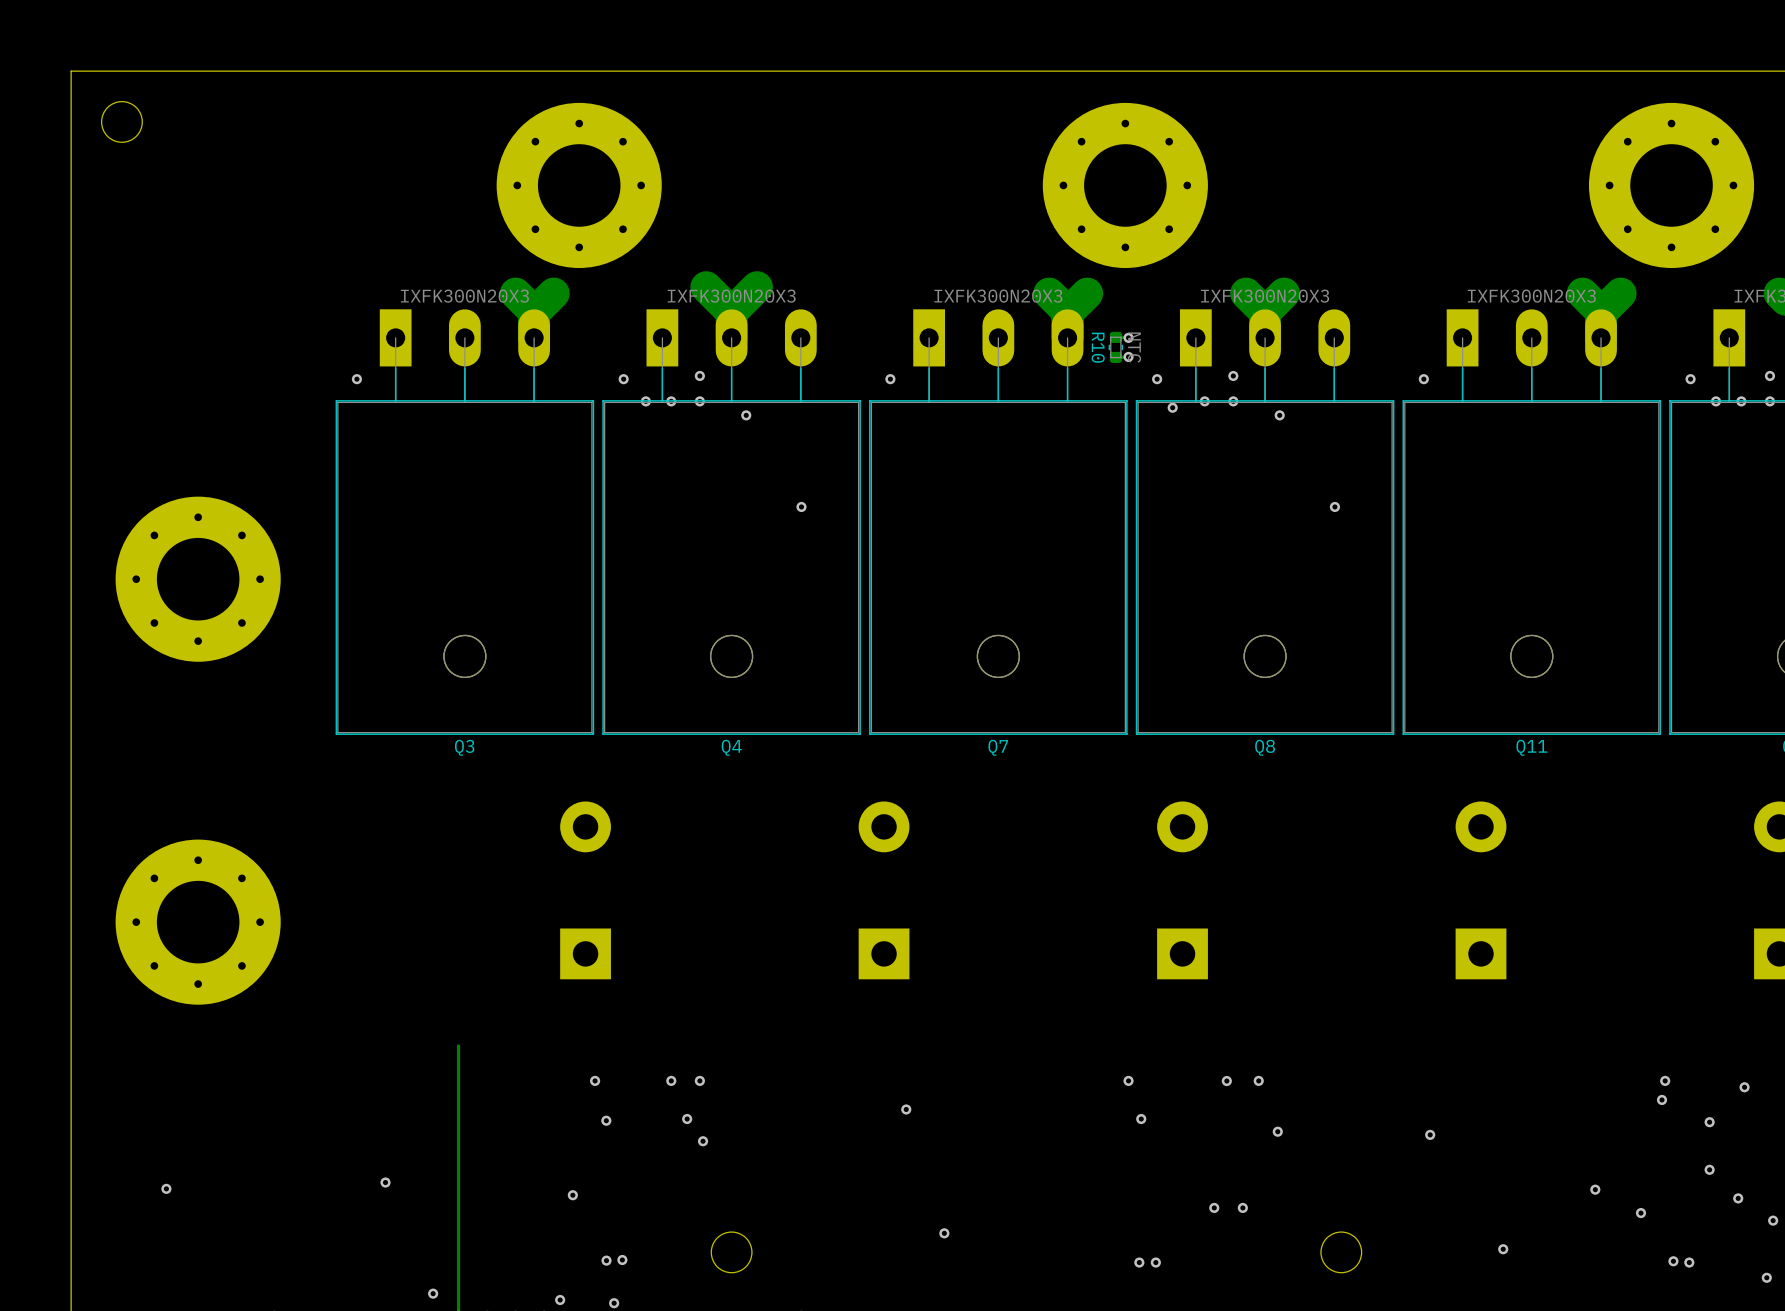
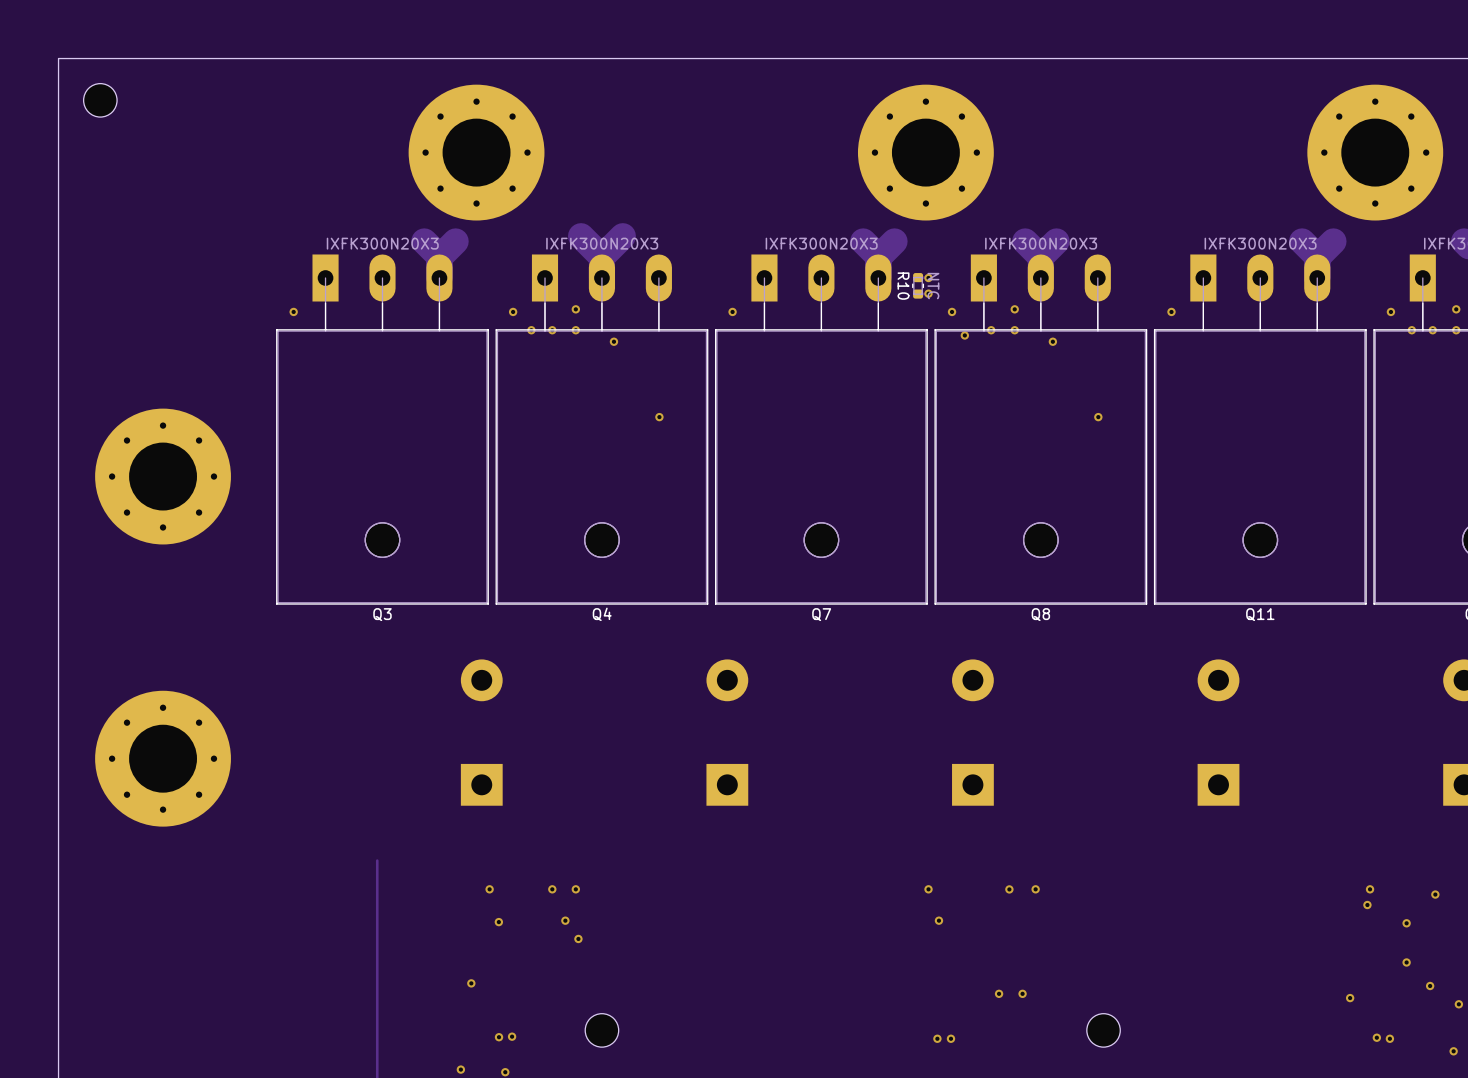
via: (906, 1109) -> none
via: (1277, 1131) -> none
via: (1430, 1134) -> none
via: (385, 1182) -> none
via: (166, 1188) -> none
via: (1595, 1189) -> none
via: (944, 1233) -> none
via: (1503, 1249) -> none
via: (433, 1293) -> none

